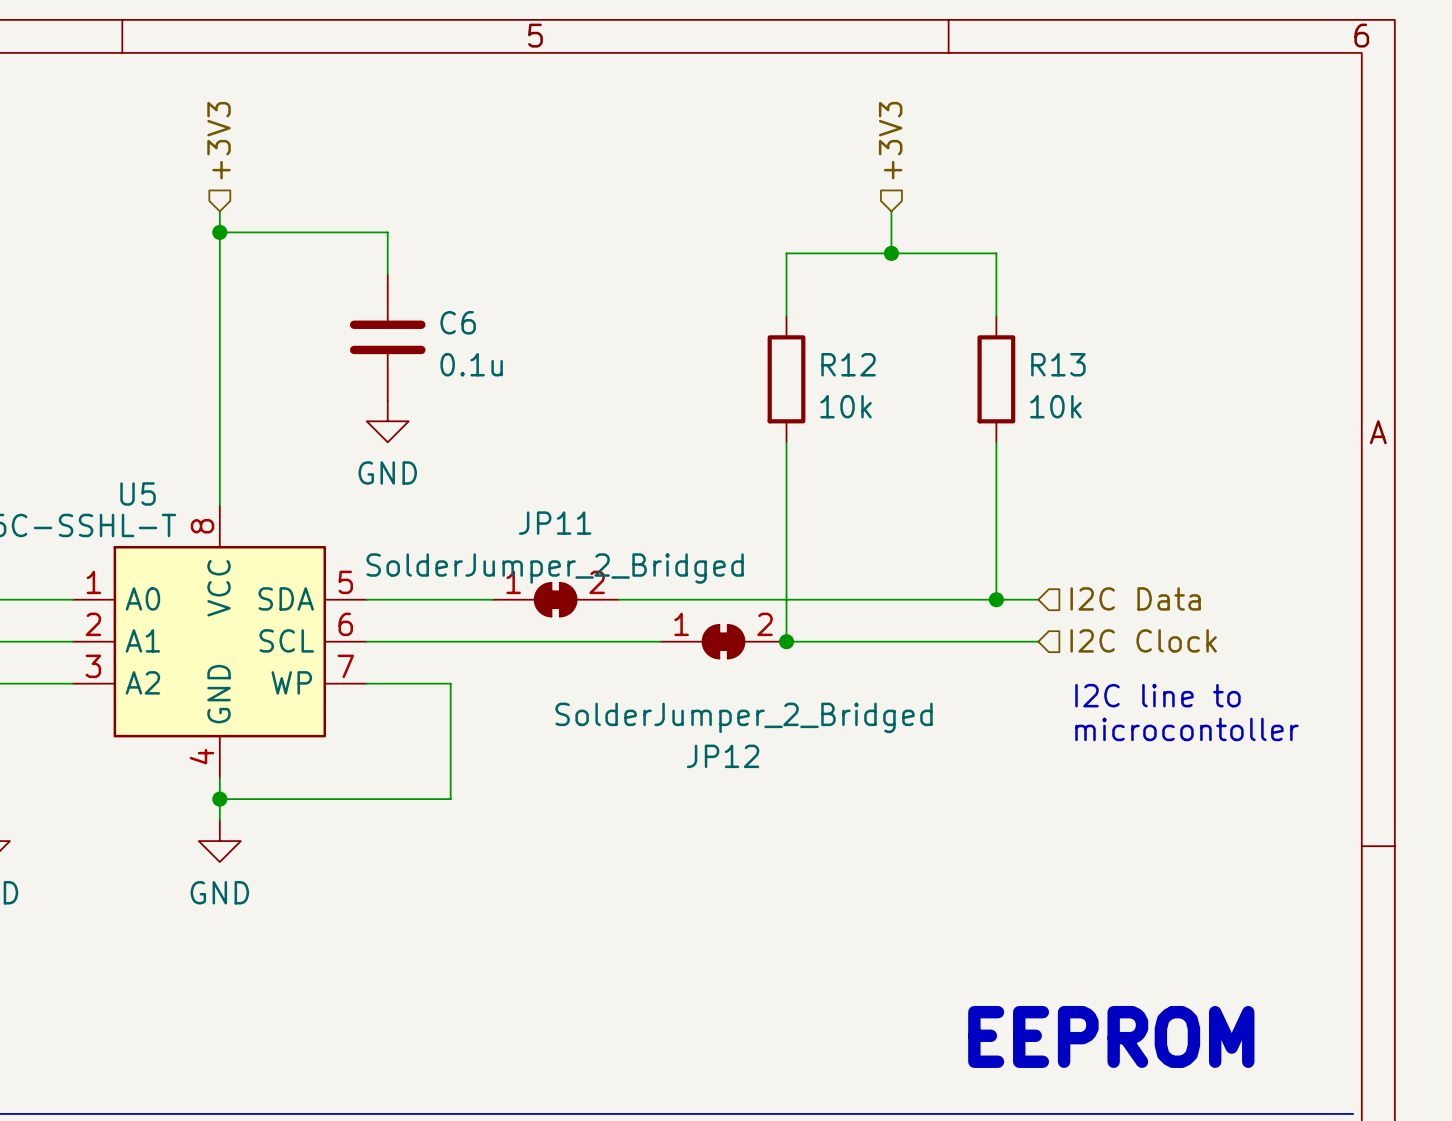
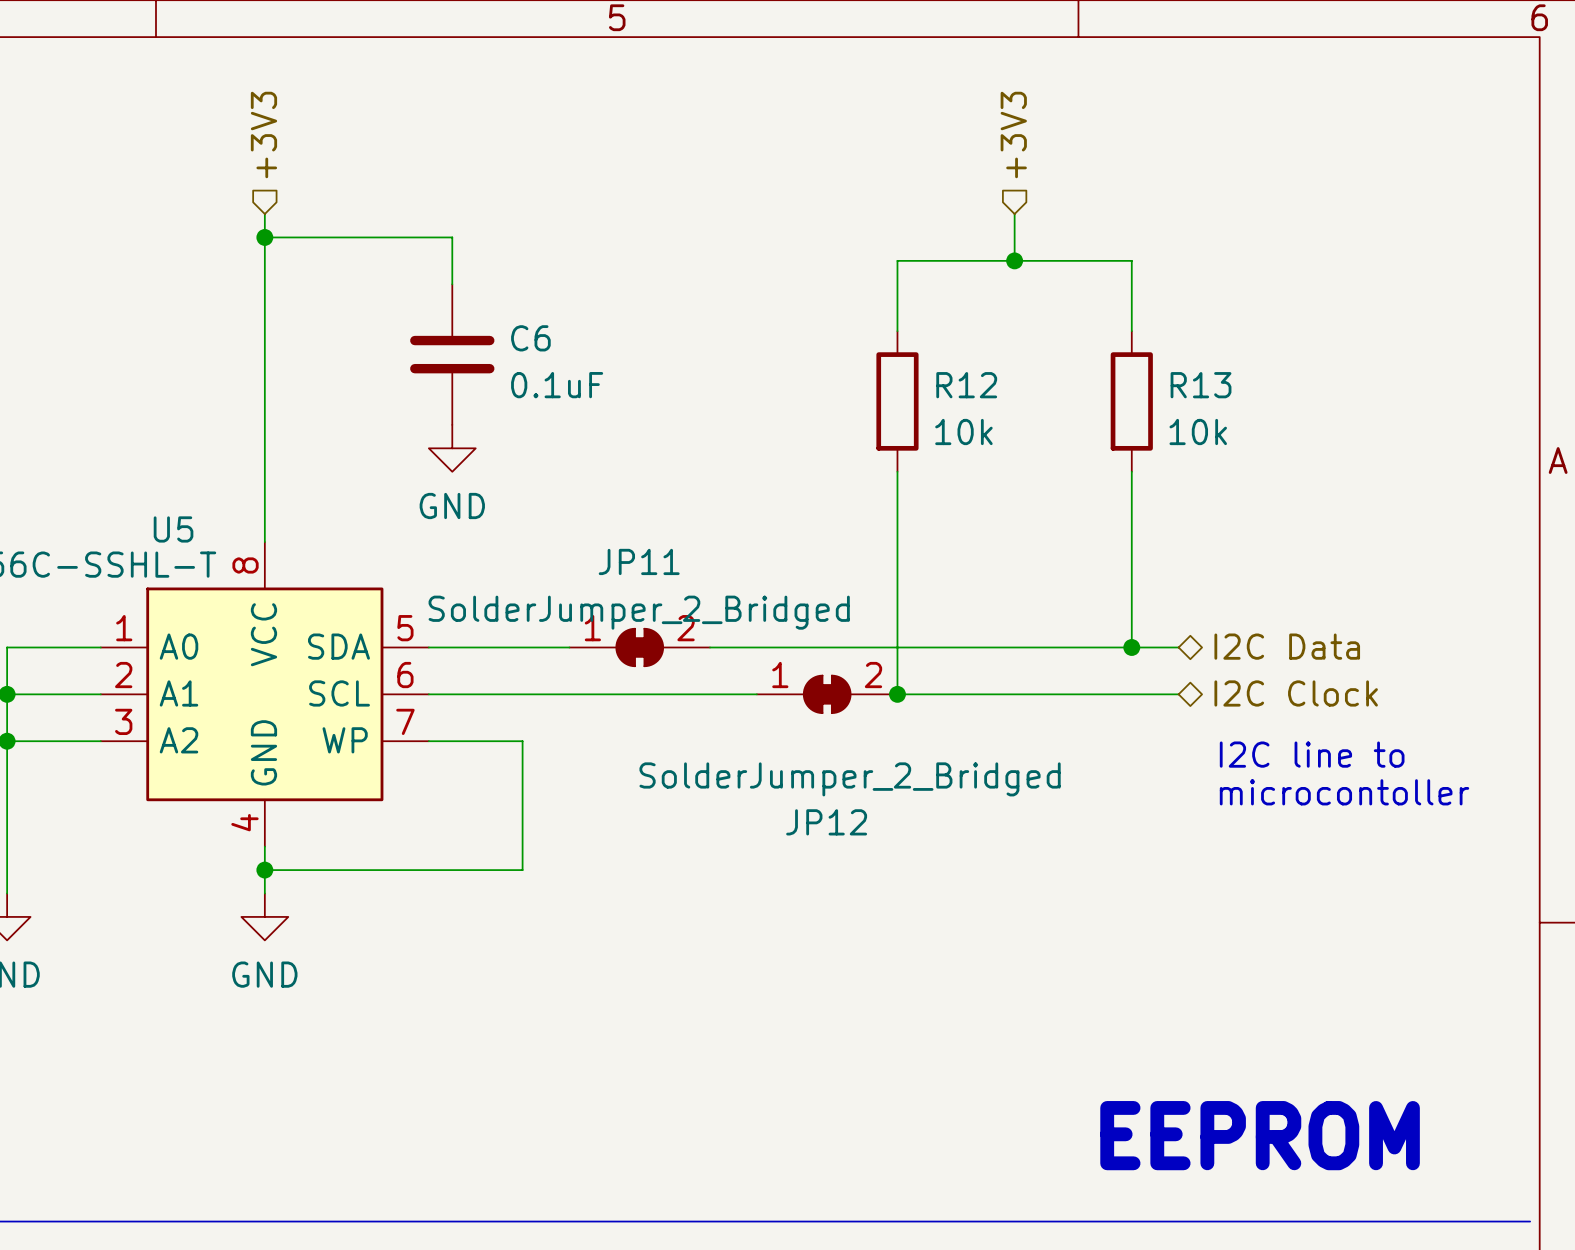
C6 value: 0.1u (471, 364) -> 0.1uF (557, 385)
hierarchical label shape: input (1135, 598) -> bidirectional (1287, 646)
hierarchical label shape: input (1143, 640) -> bidirectional (1296, 693)

